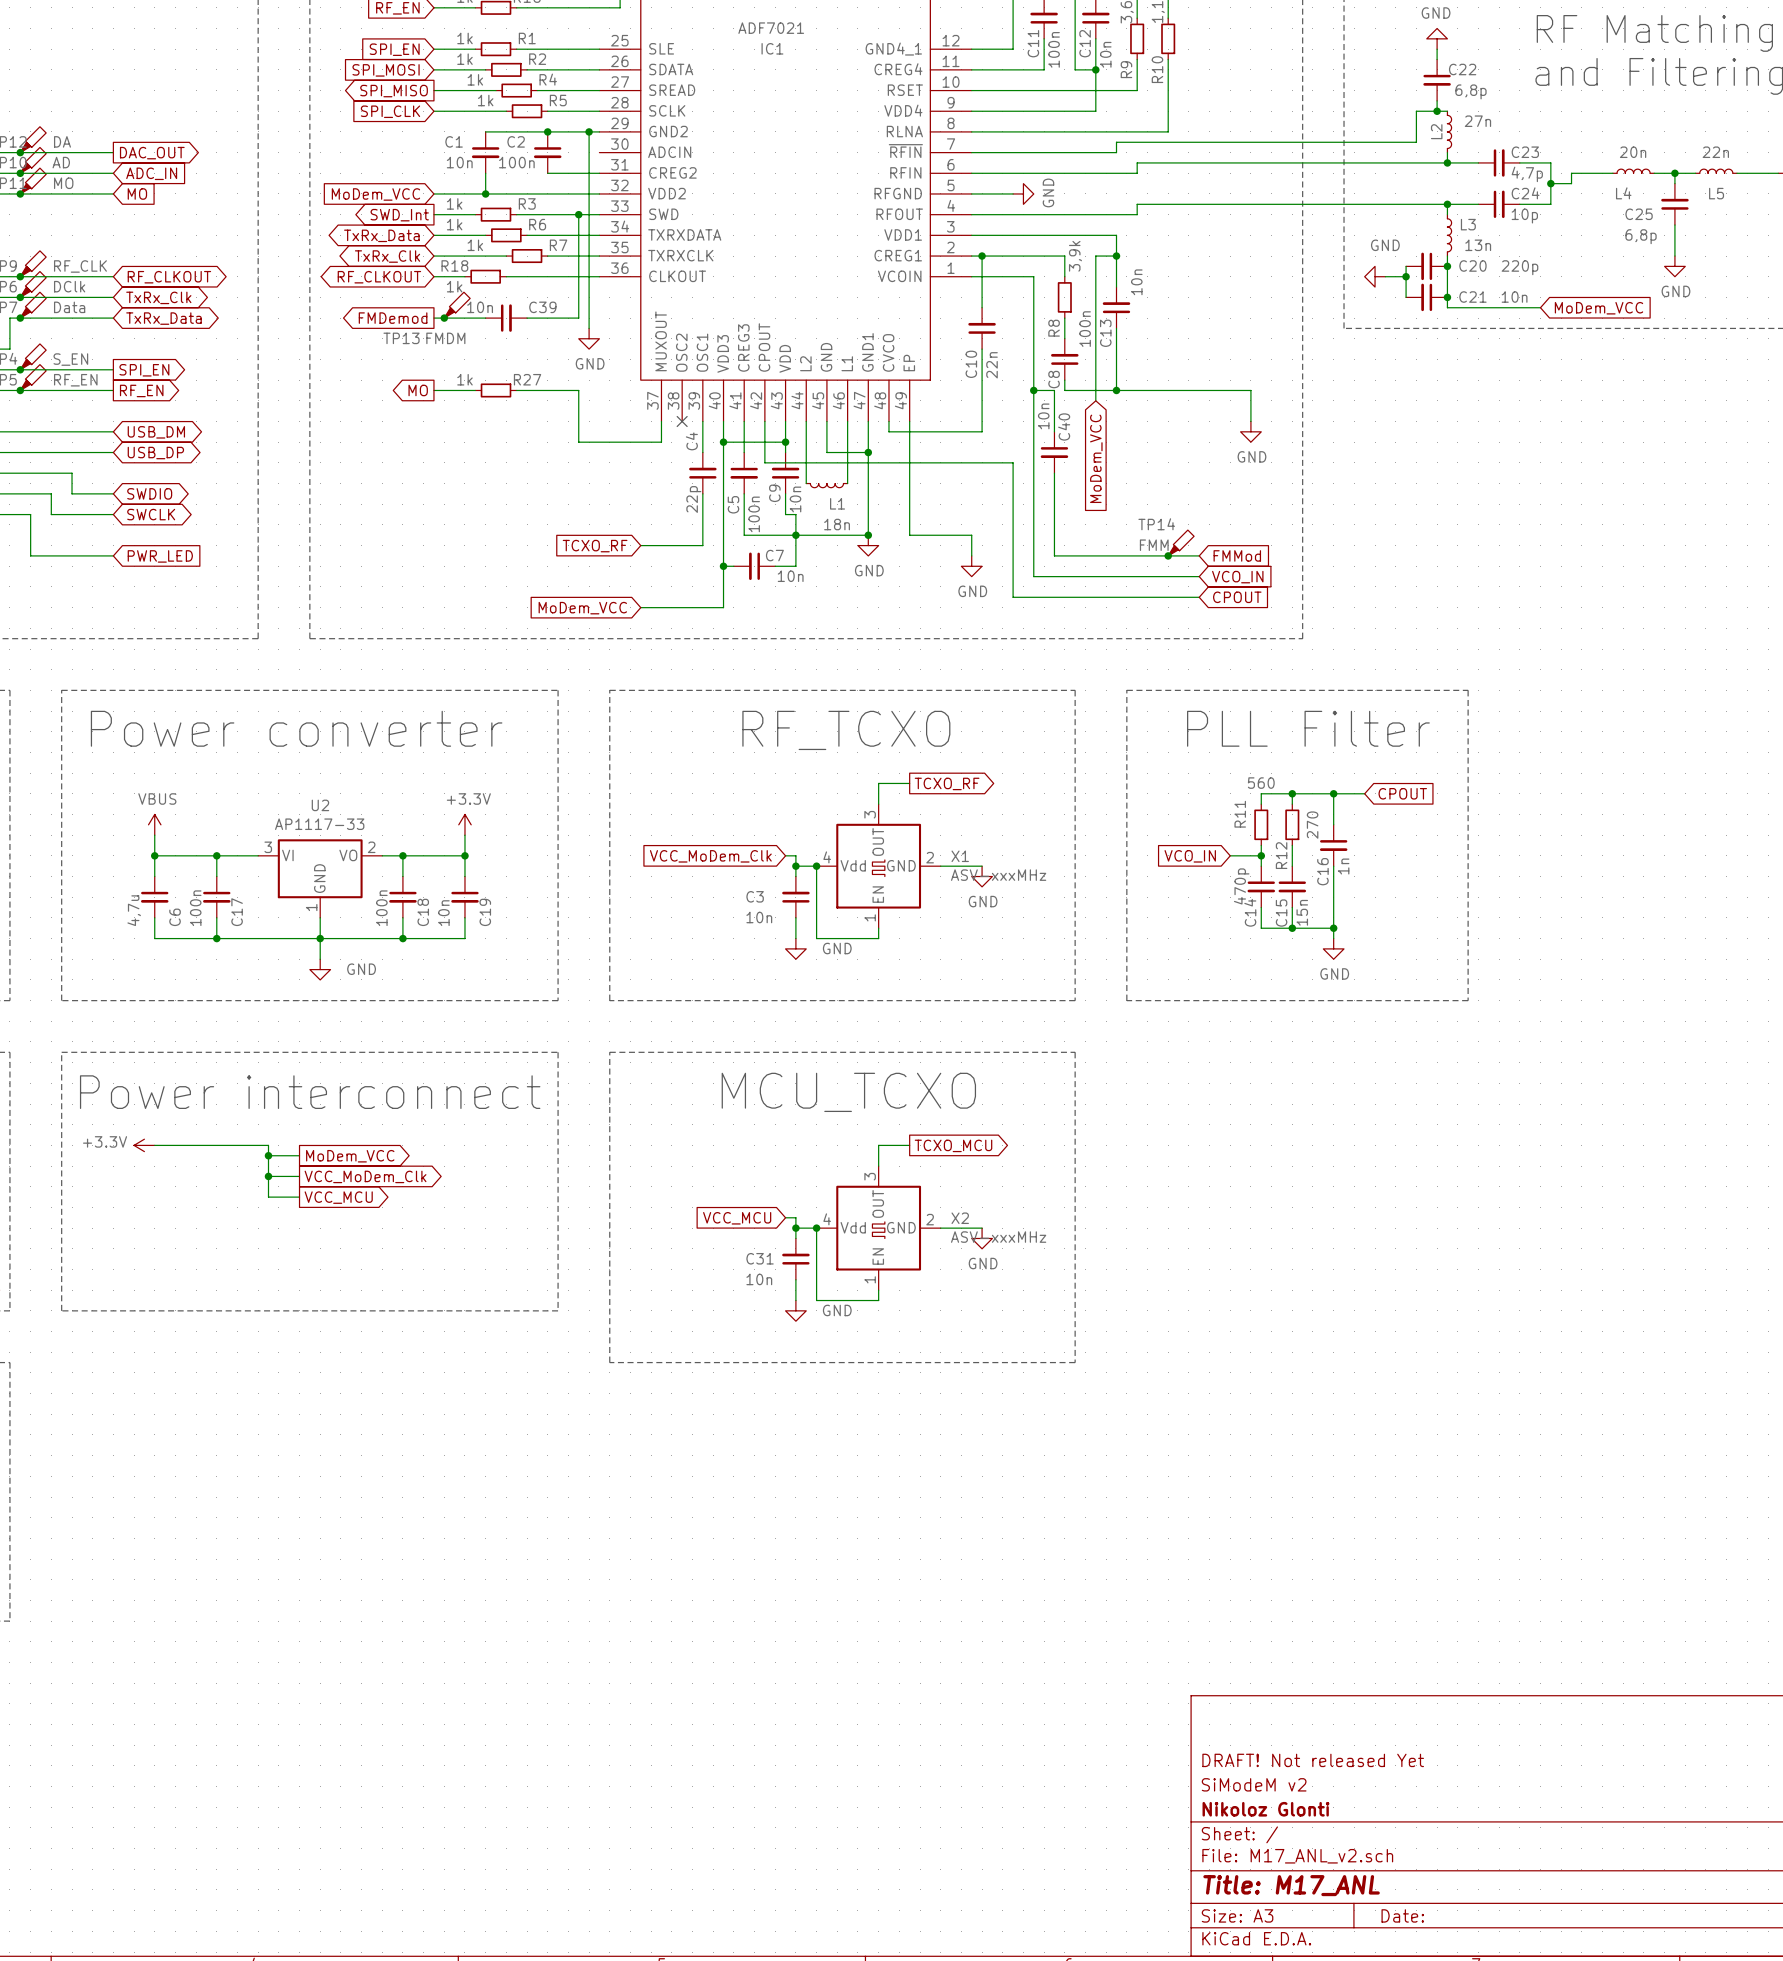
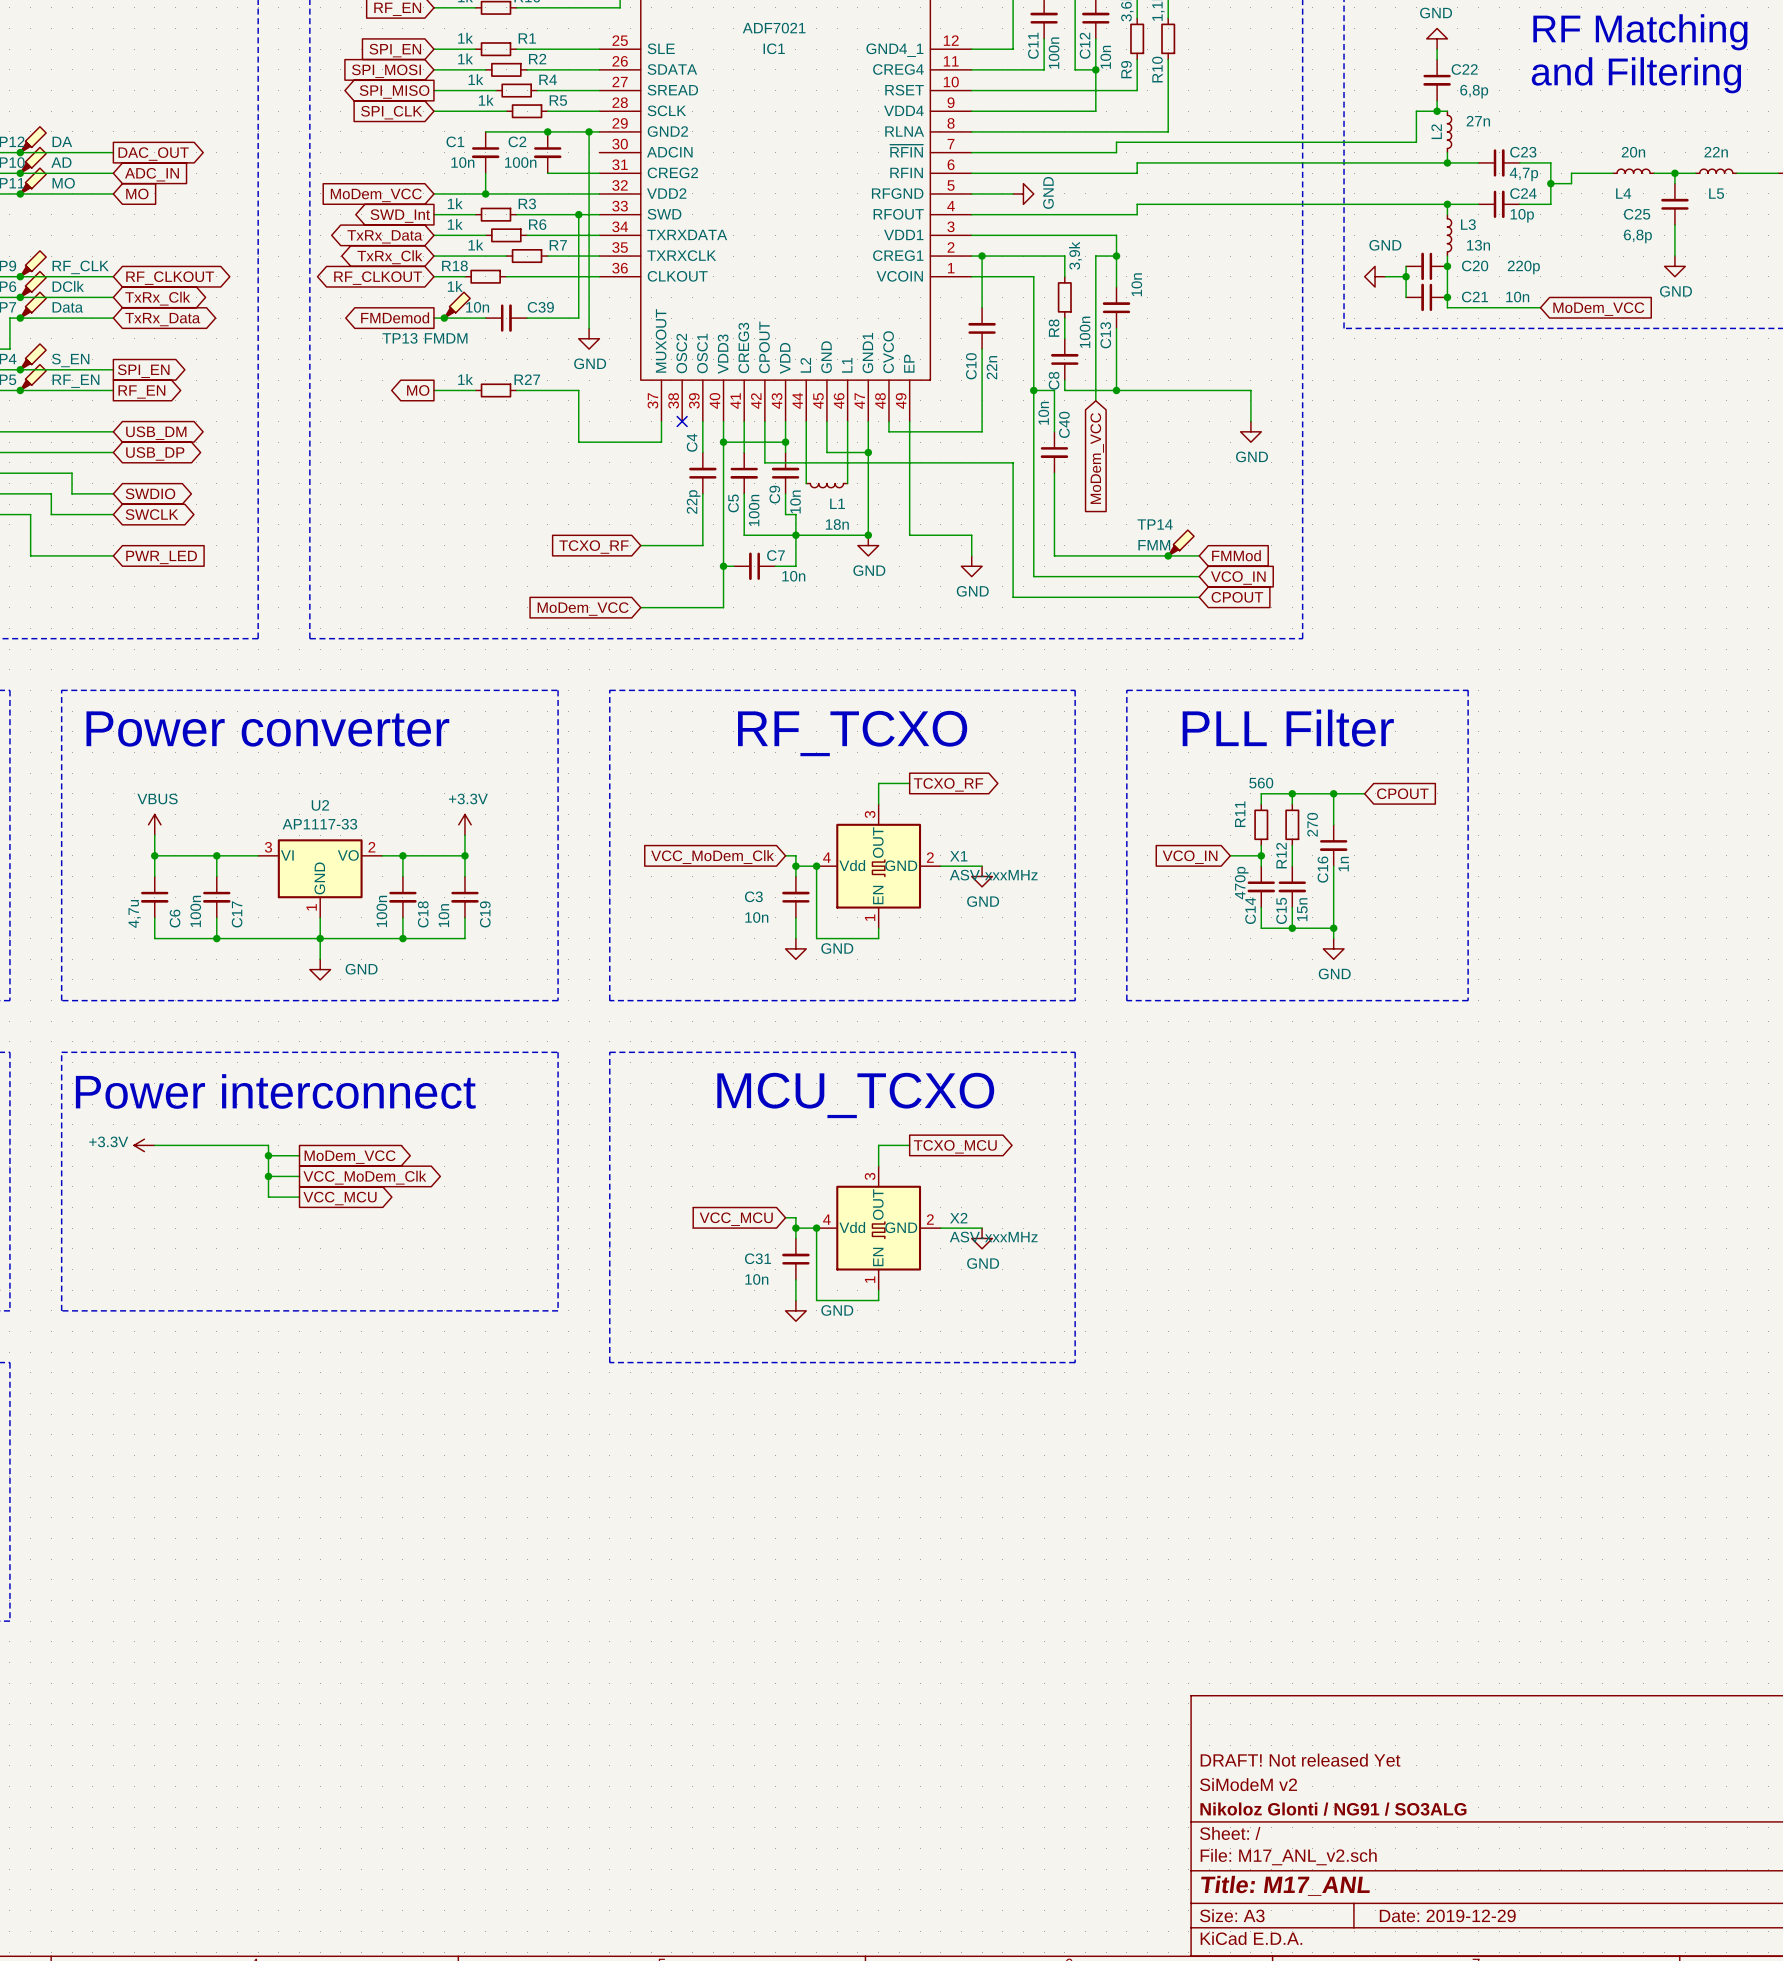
title block: Nikoloz Glonti (1265, 1809) -> Nikoloz Glonti / NG91 / SO3ALG (1333, 1809)
title block: Date: (1402, 1915) -> Date: 2019-12-29 (1447, 1915)

